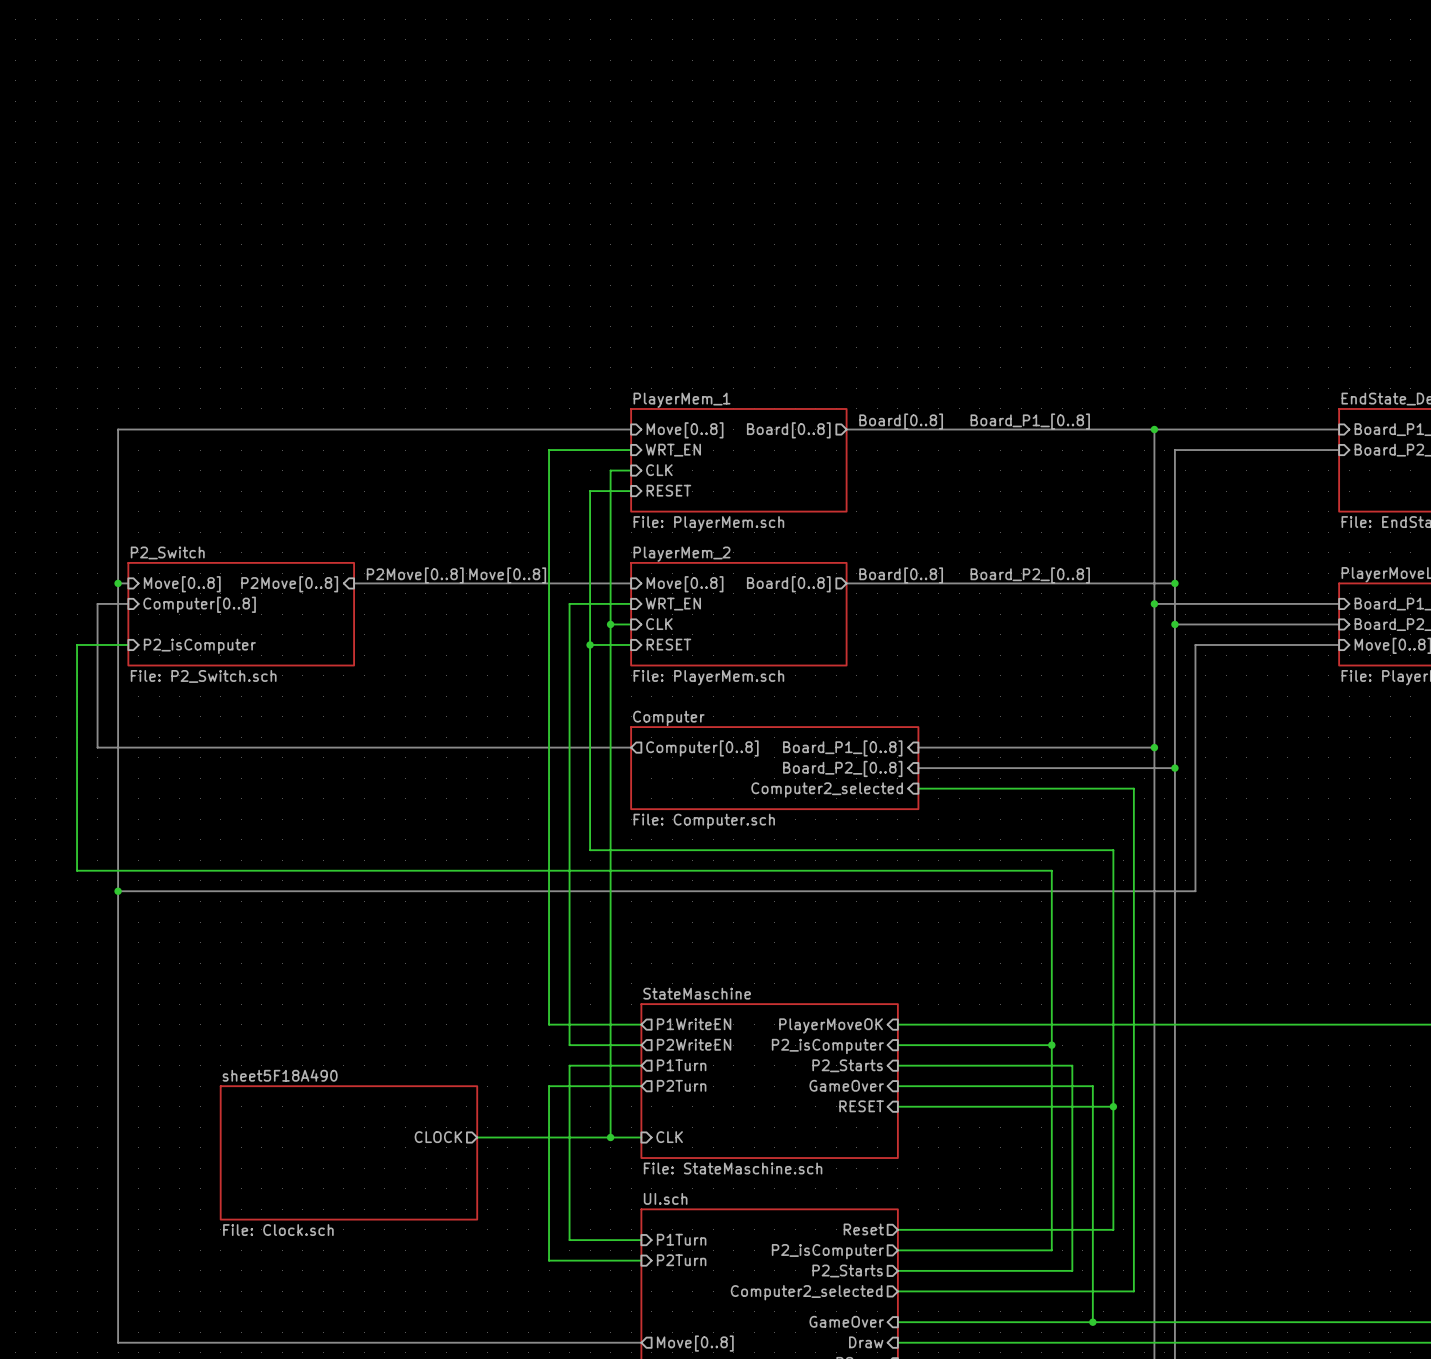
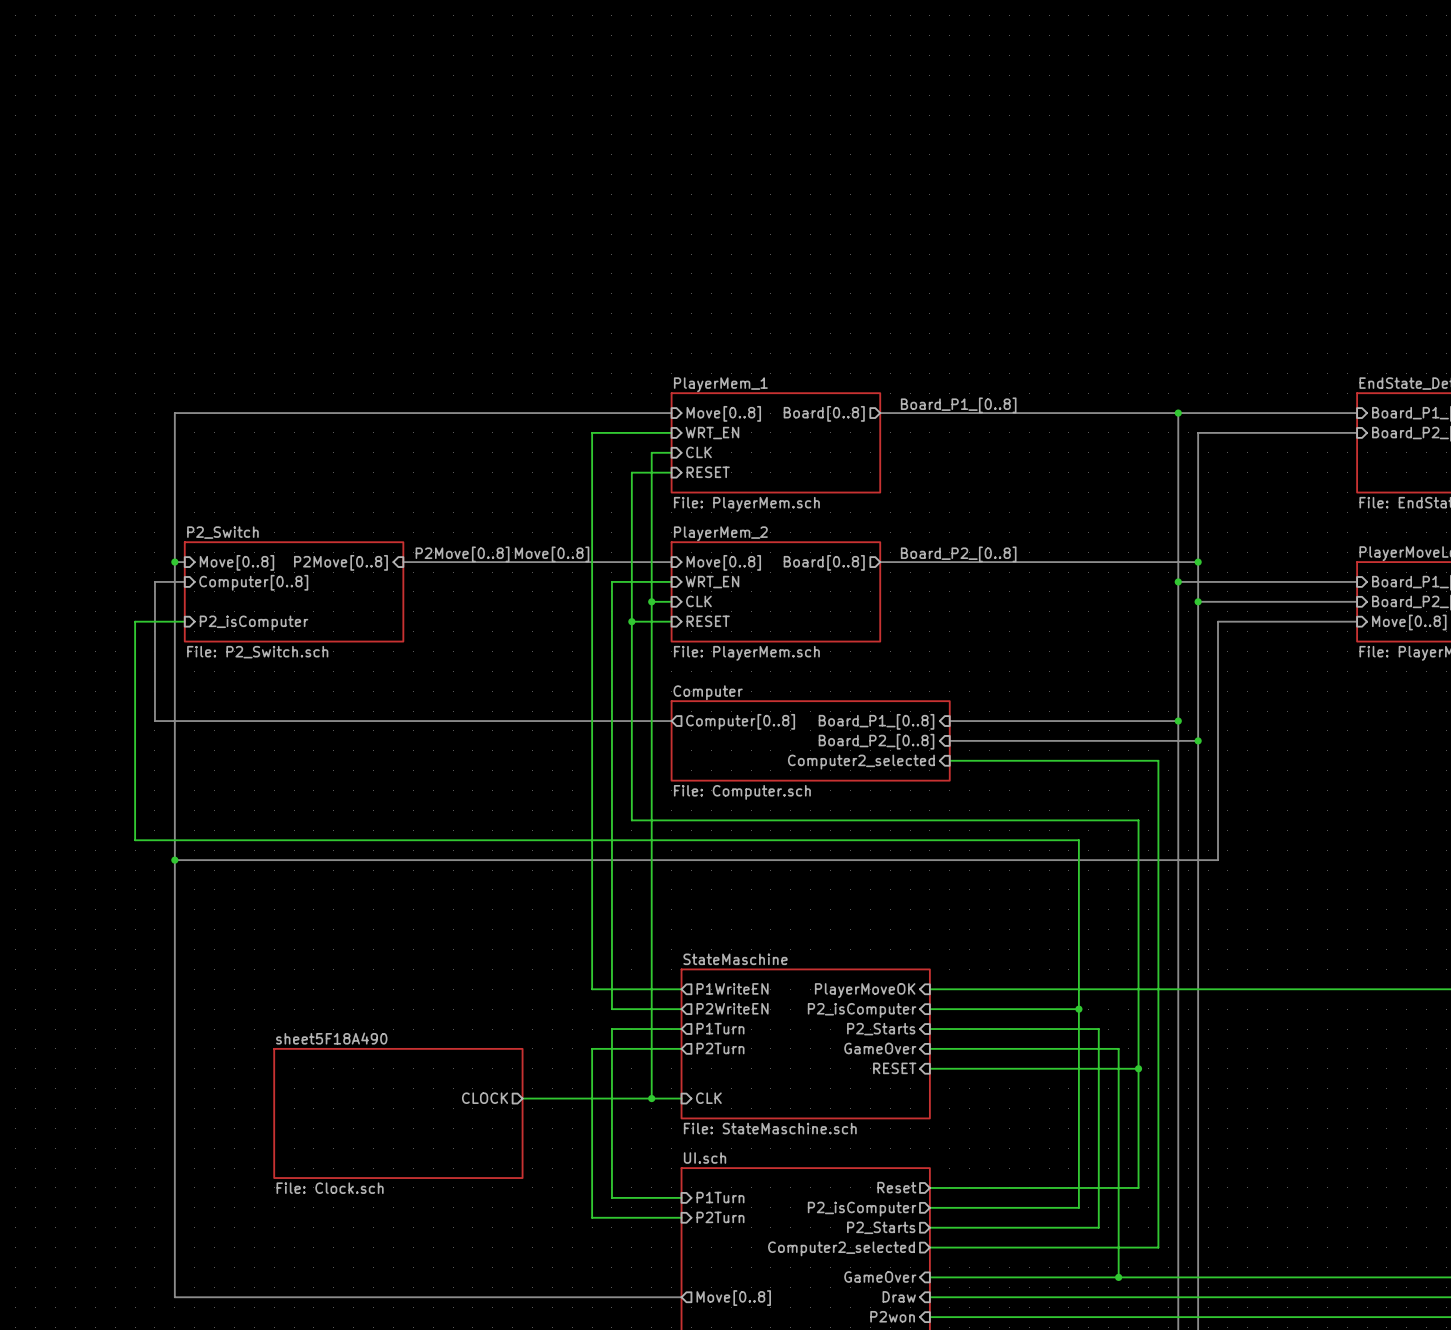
label: Board[0..8] (901, 421) -> none
label position: Board_P1_[0..8] (1030, 421) -> Board_P1_[0..8] (958, 405)
label: Board[0..8] (901, 575) -> none
label position: Board_P2_[0..8] (1030, 575) -> Board_P2_[0..8] (958, 554)

